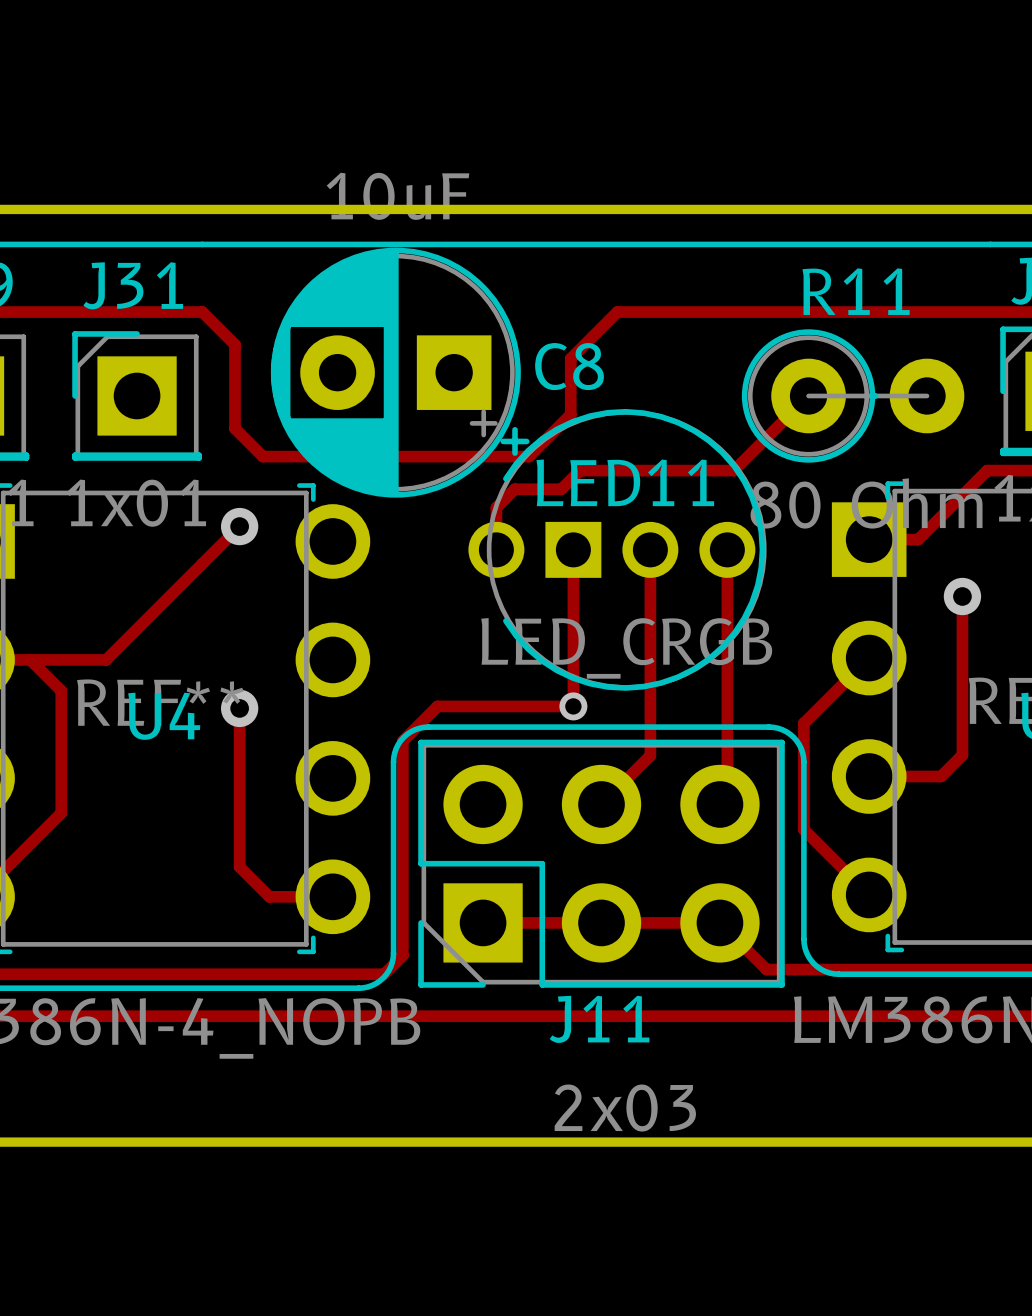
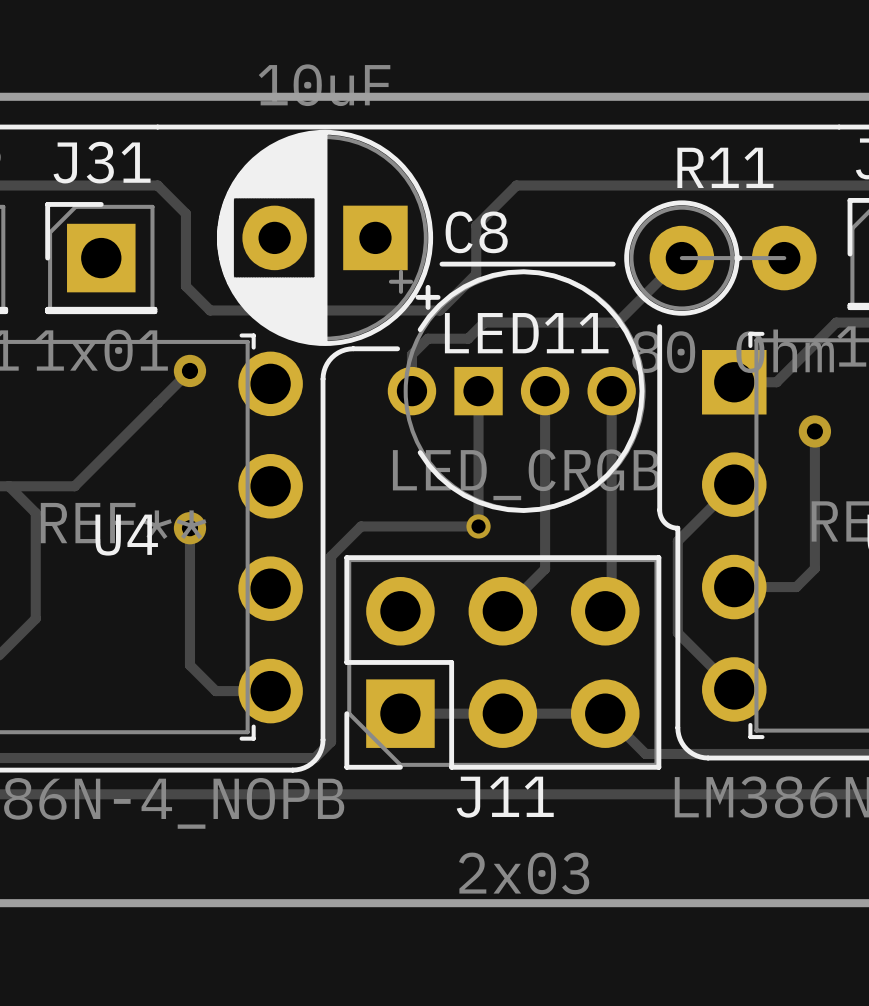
line: none -> (441, 264) (613, 264)
line: none -> (659, 326) (659, 512) (666, 524) (677, 528) (677, 574)
line: (393, 762) (396, 748) (403, 737) (415, 729) (428, 727) (773, 727) (782, 729) (793, 737) (801, 748) (803, 762) -> (323, 574) (324, 371) (331, 357) (345, 349) (397, 348)

